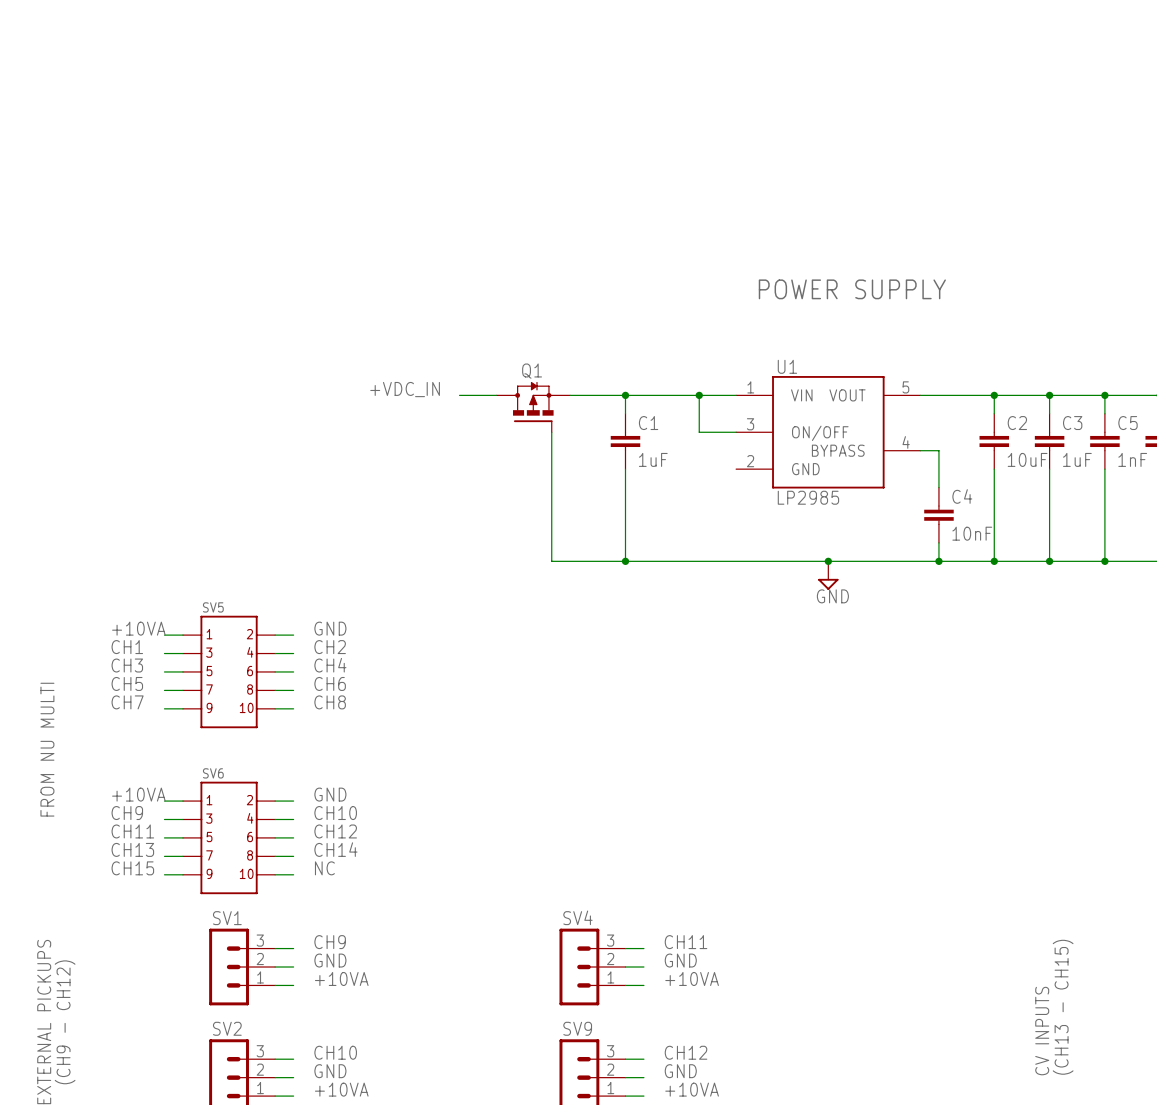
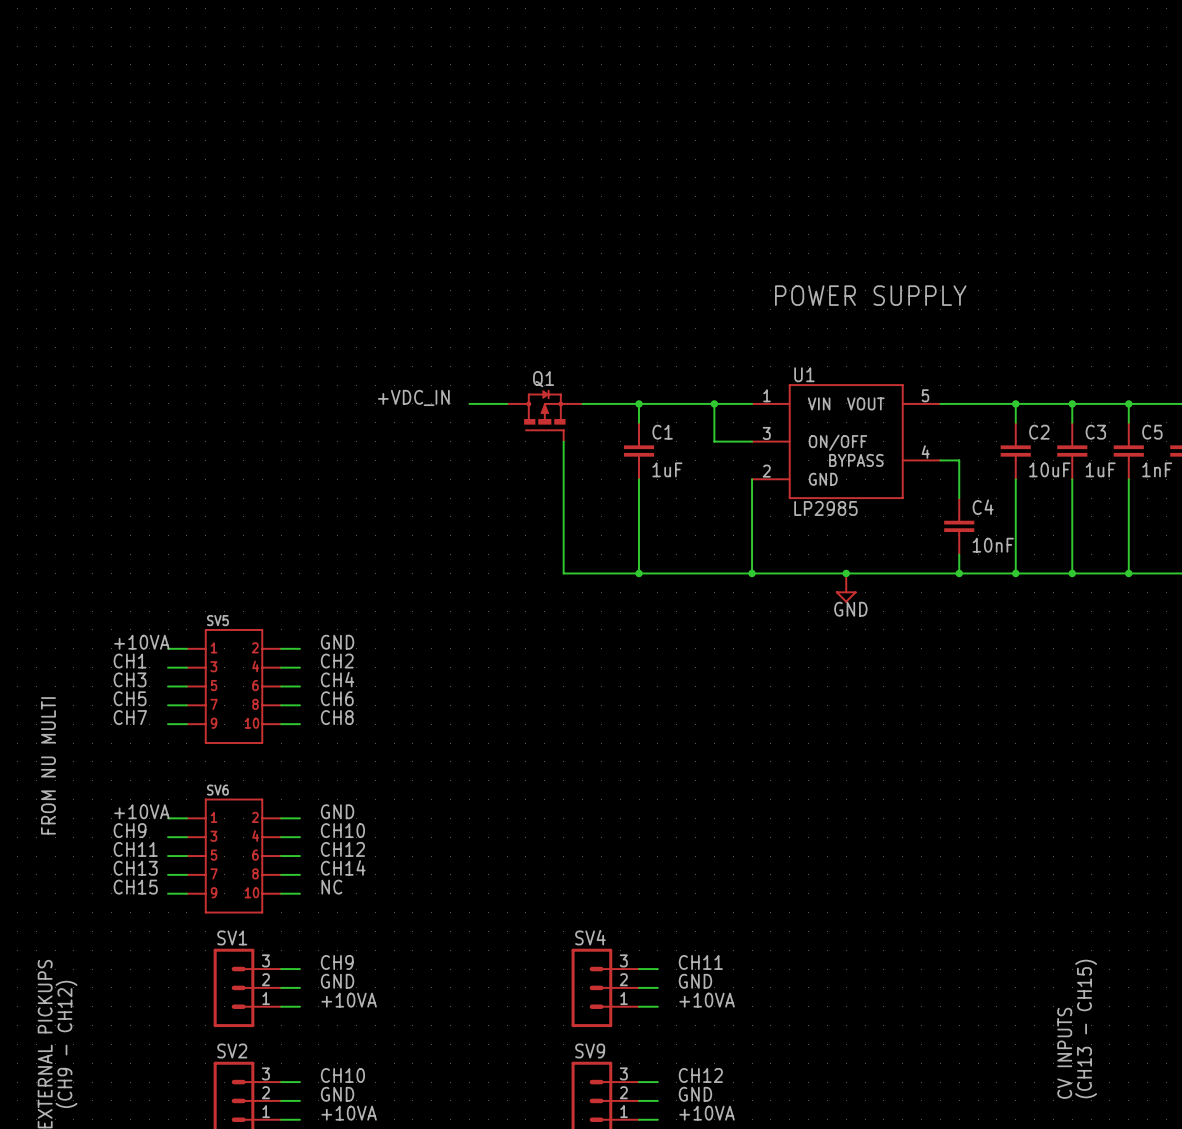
wire: none -> (752, 479) (752, 573)
junction: none -> (752, 573)

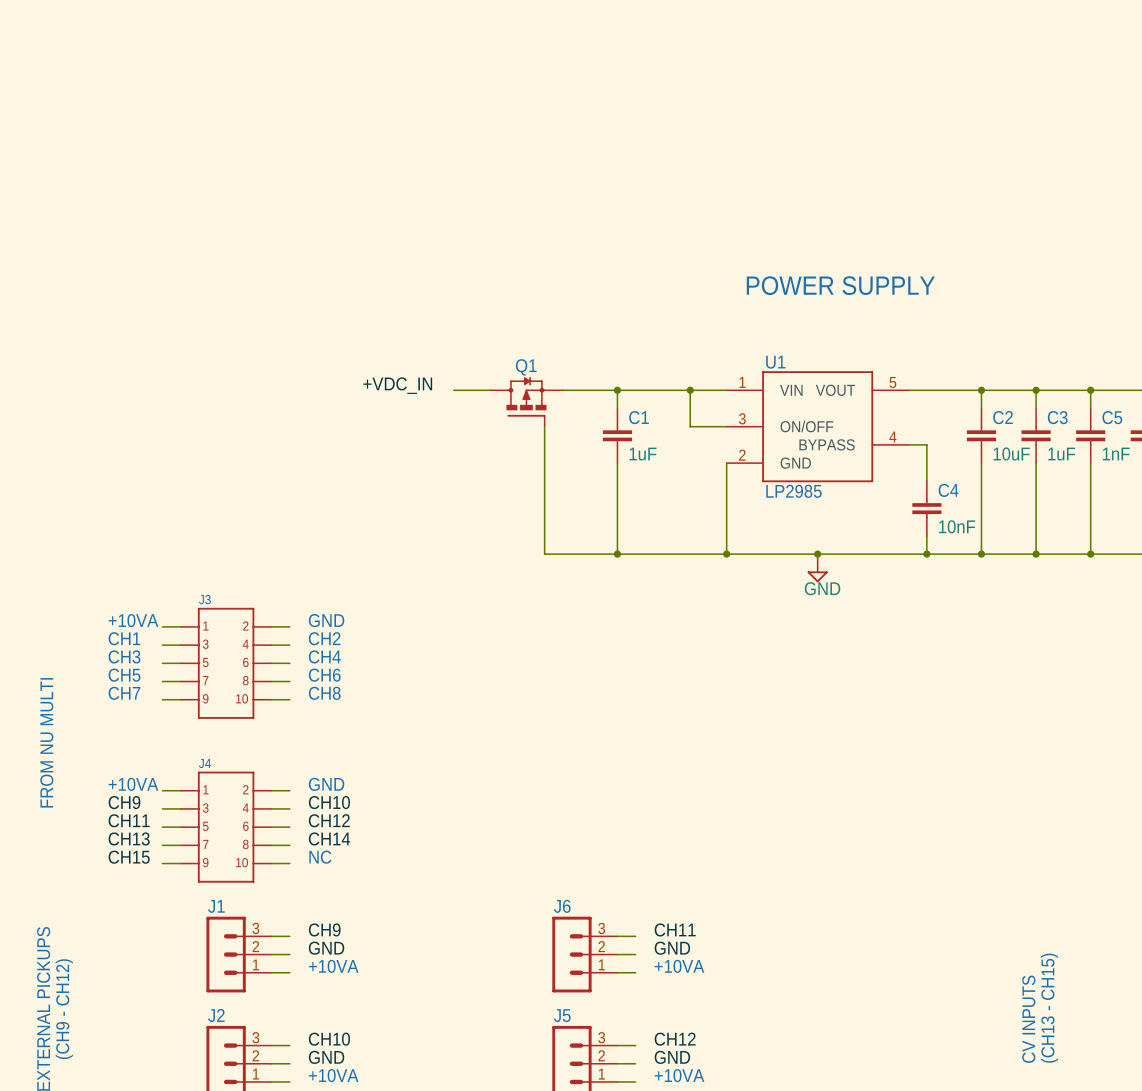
SV5 name: SV5 (217, 620) -> J3 (204, 599)
SV6 name: SV6 (217, 790) -> J4 (205, 763)
SV1 name: SV1 (232, 937) -> J1 (216, 906)
SV4 name: SV4 (590, 937) -> J6 (562, 906)
SV2 name: SV2 (232, 1051) -> J2 (216, 1015)
SV9 name: SV9 (590, 1051) -> J5 (562, 1015)

